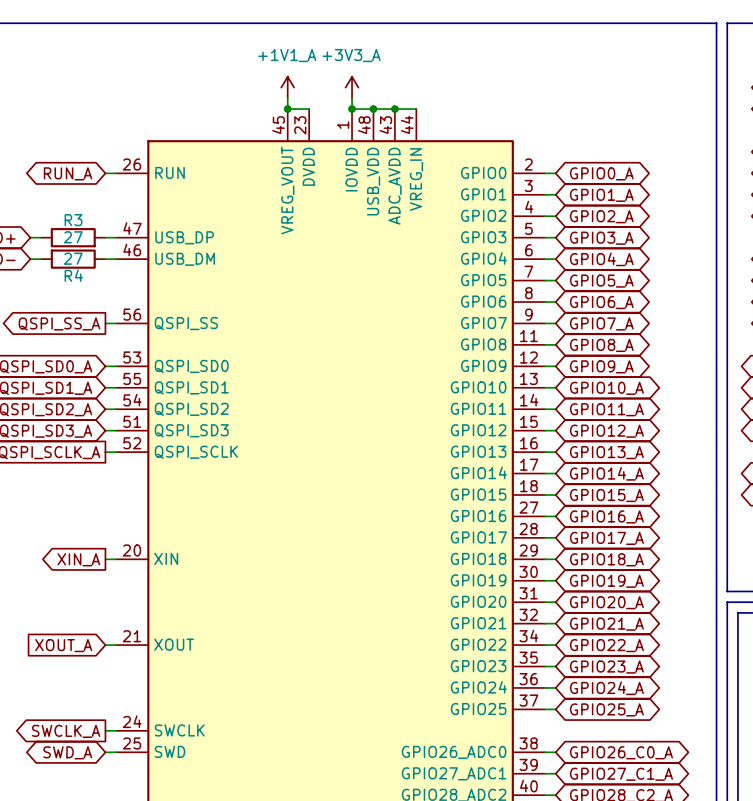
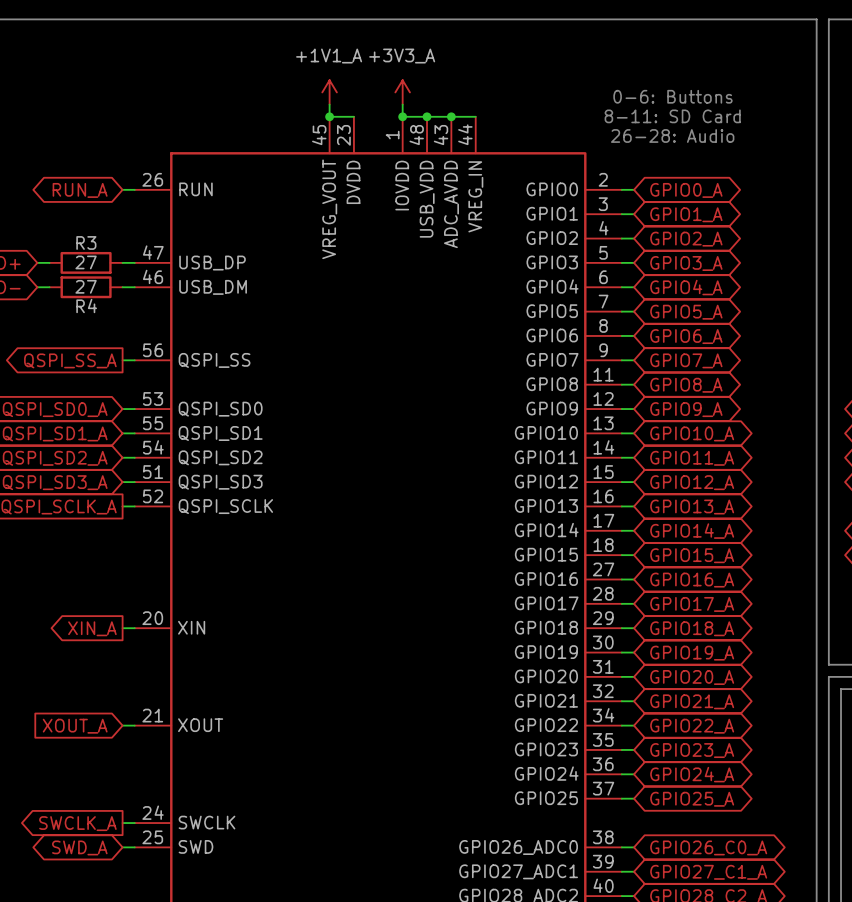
text: none -> 0-6: Buttons (672, 96)
text: none -> 8-11: SD Card (672, 116)
text: none -> 26-28: Audio (672, 135)

